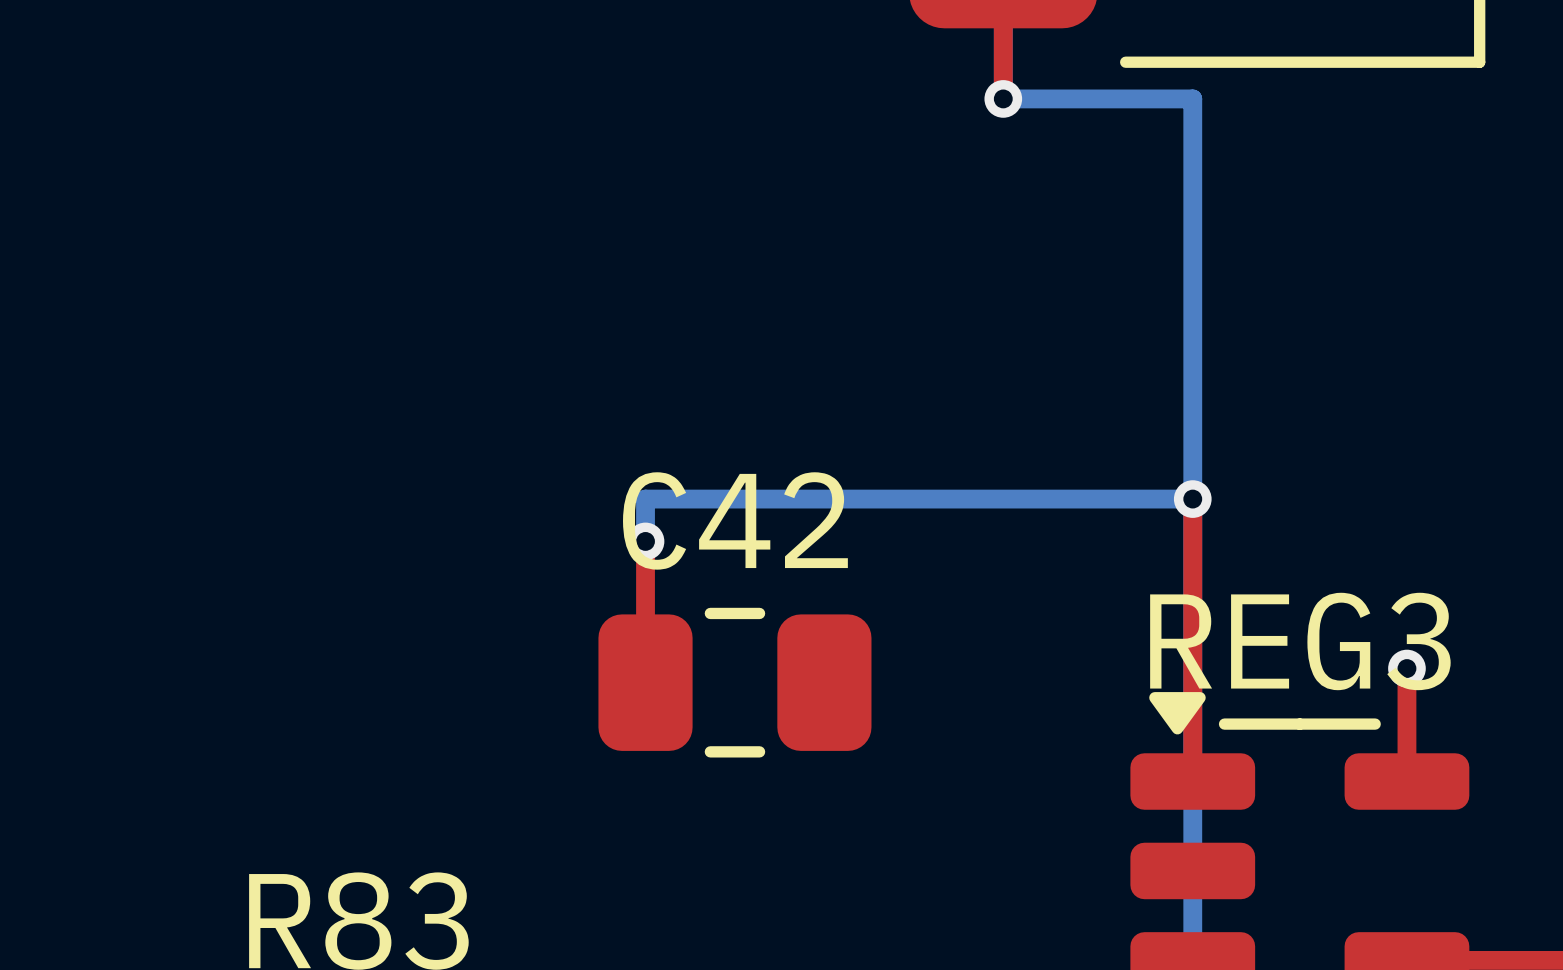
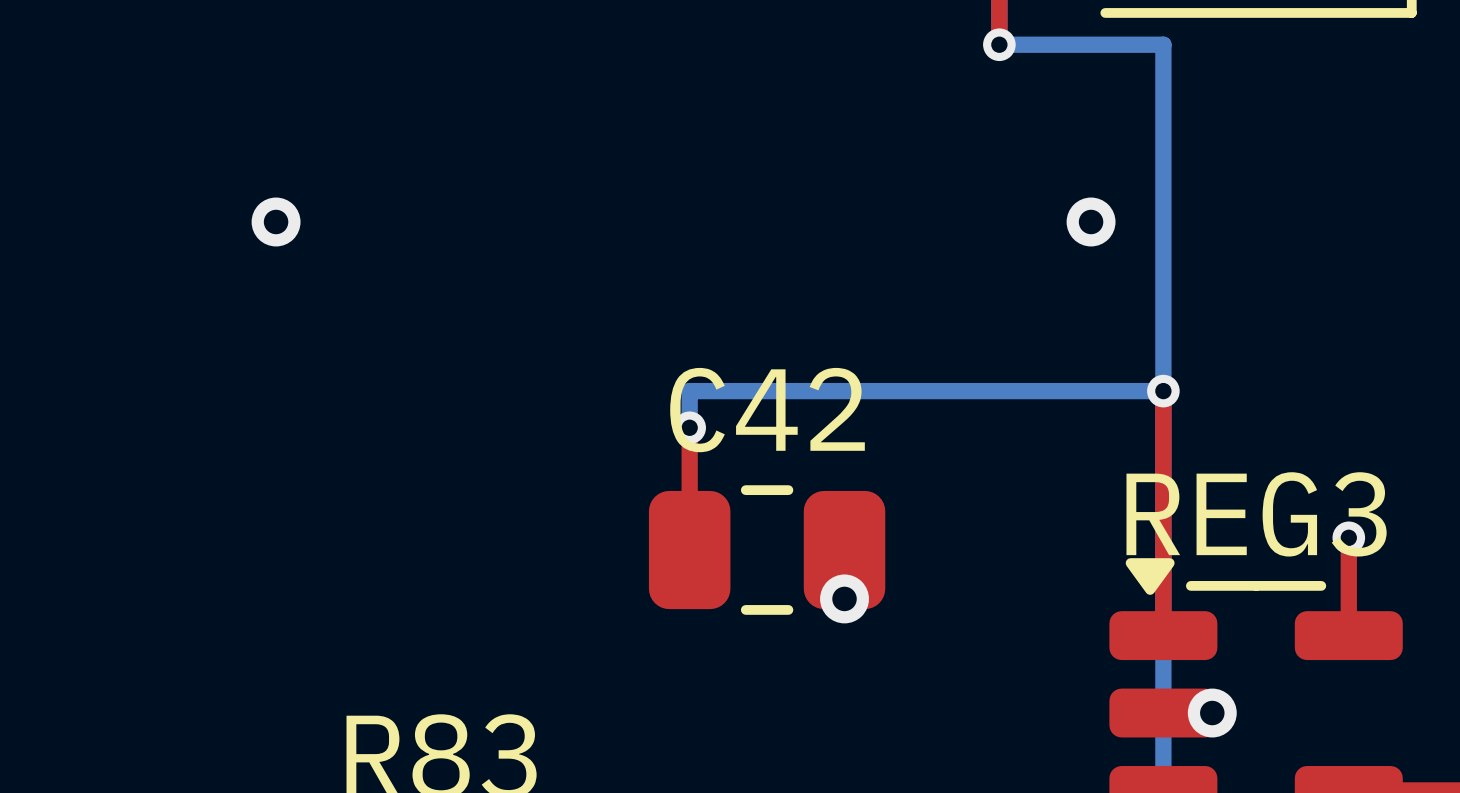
via: none -> (276, 221)
via: none -> (1091, 221)
via: none -> (844, 598)
via: none -> (1212, 713)

